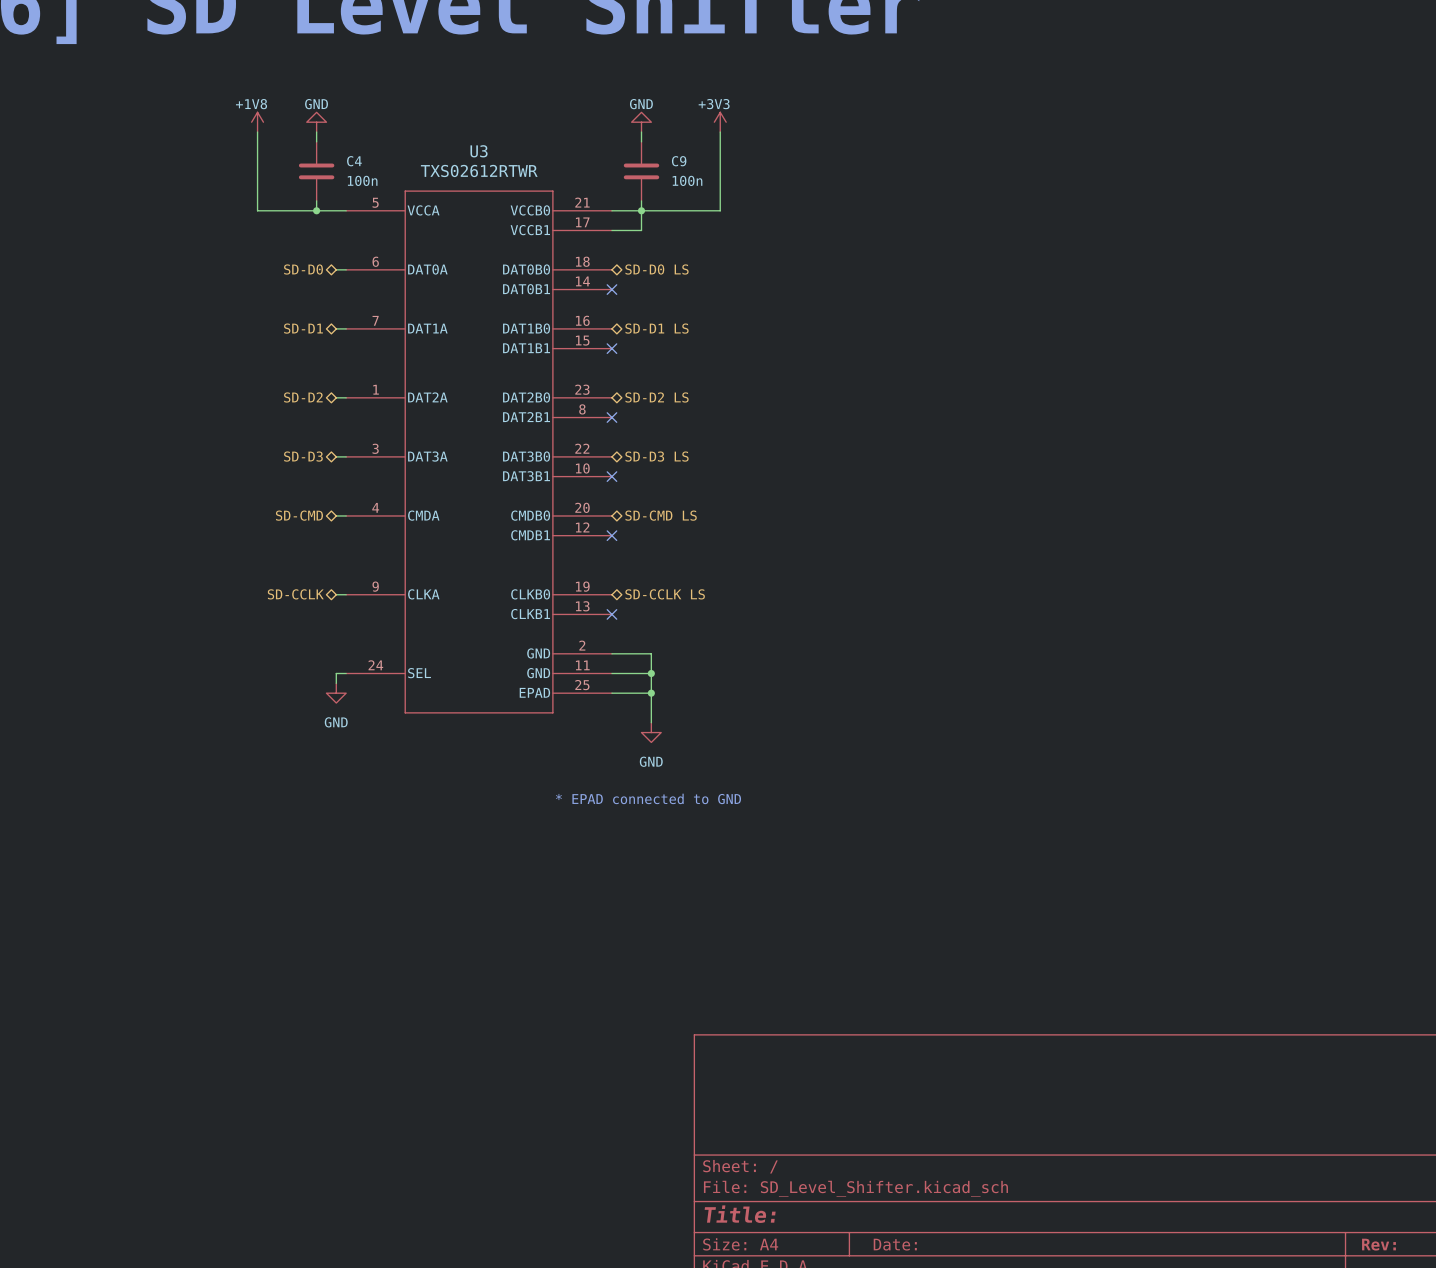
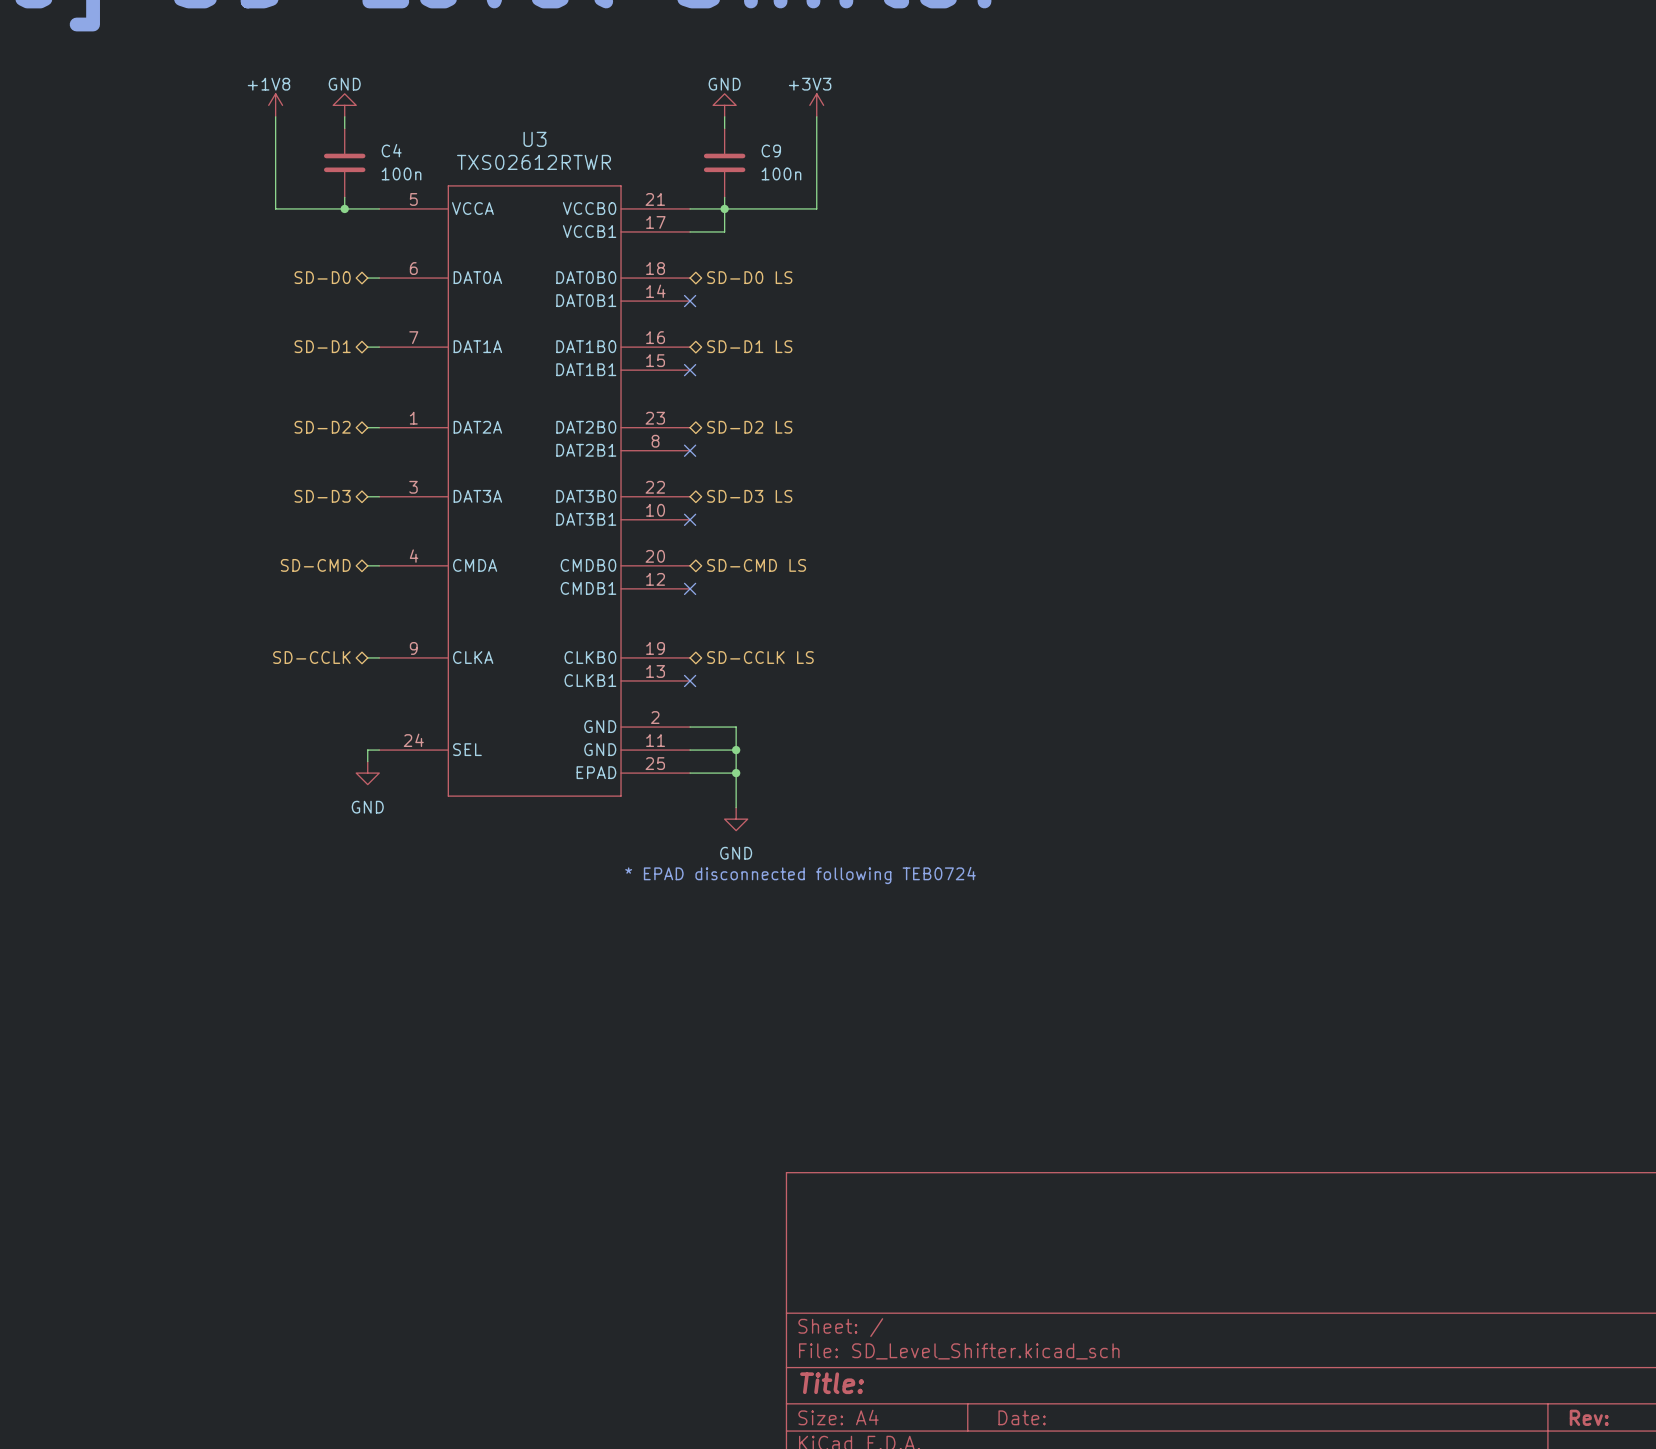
text: * EPAD connected to GND (648, 798) -> * EPAD disconnected following TEB0724 (800, 875)

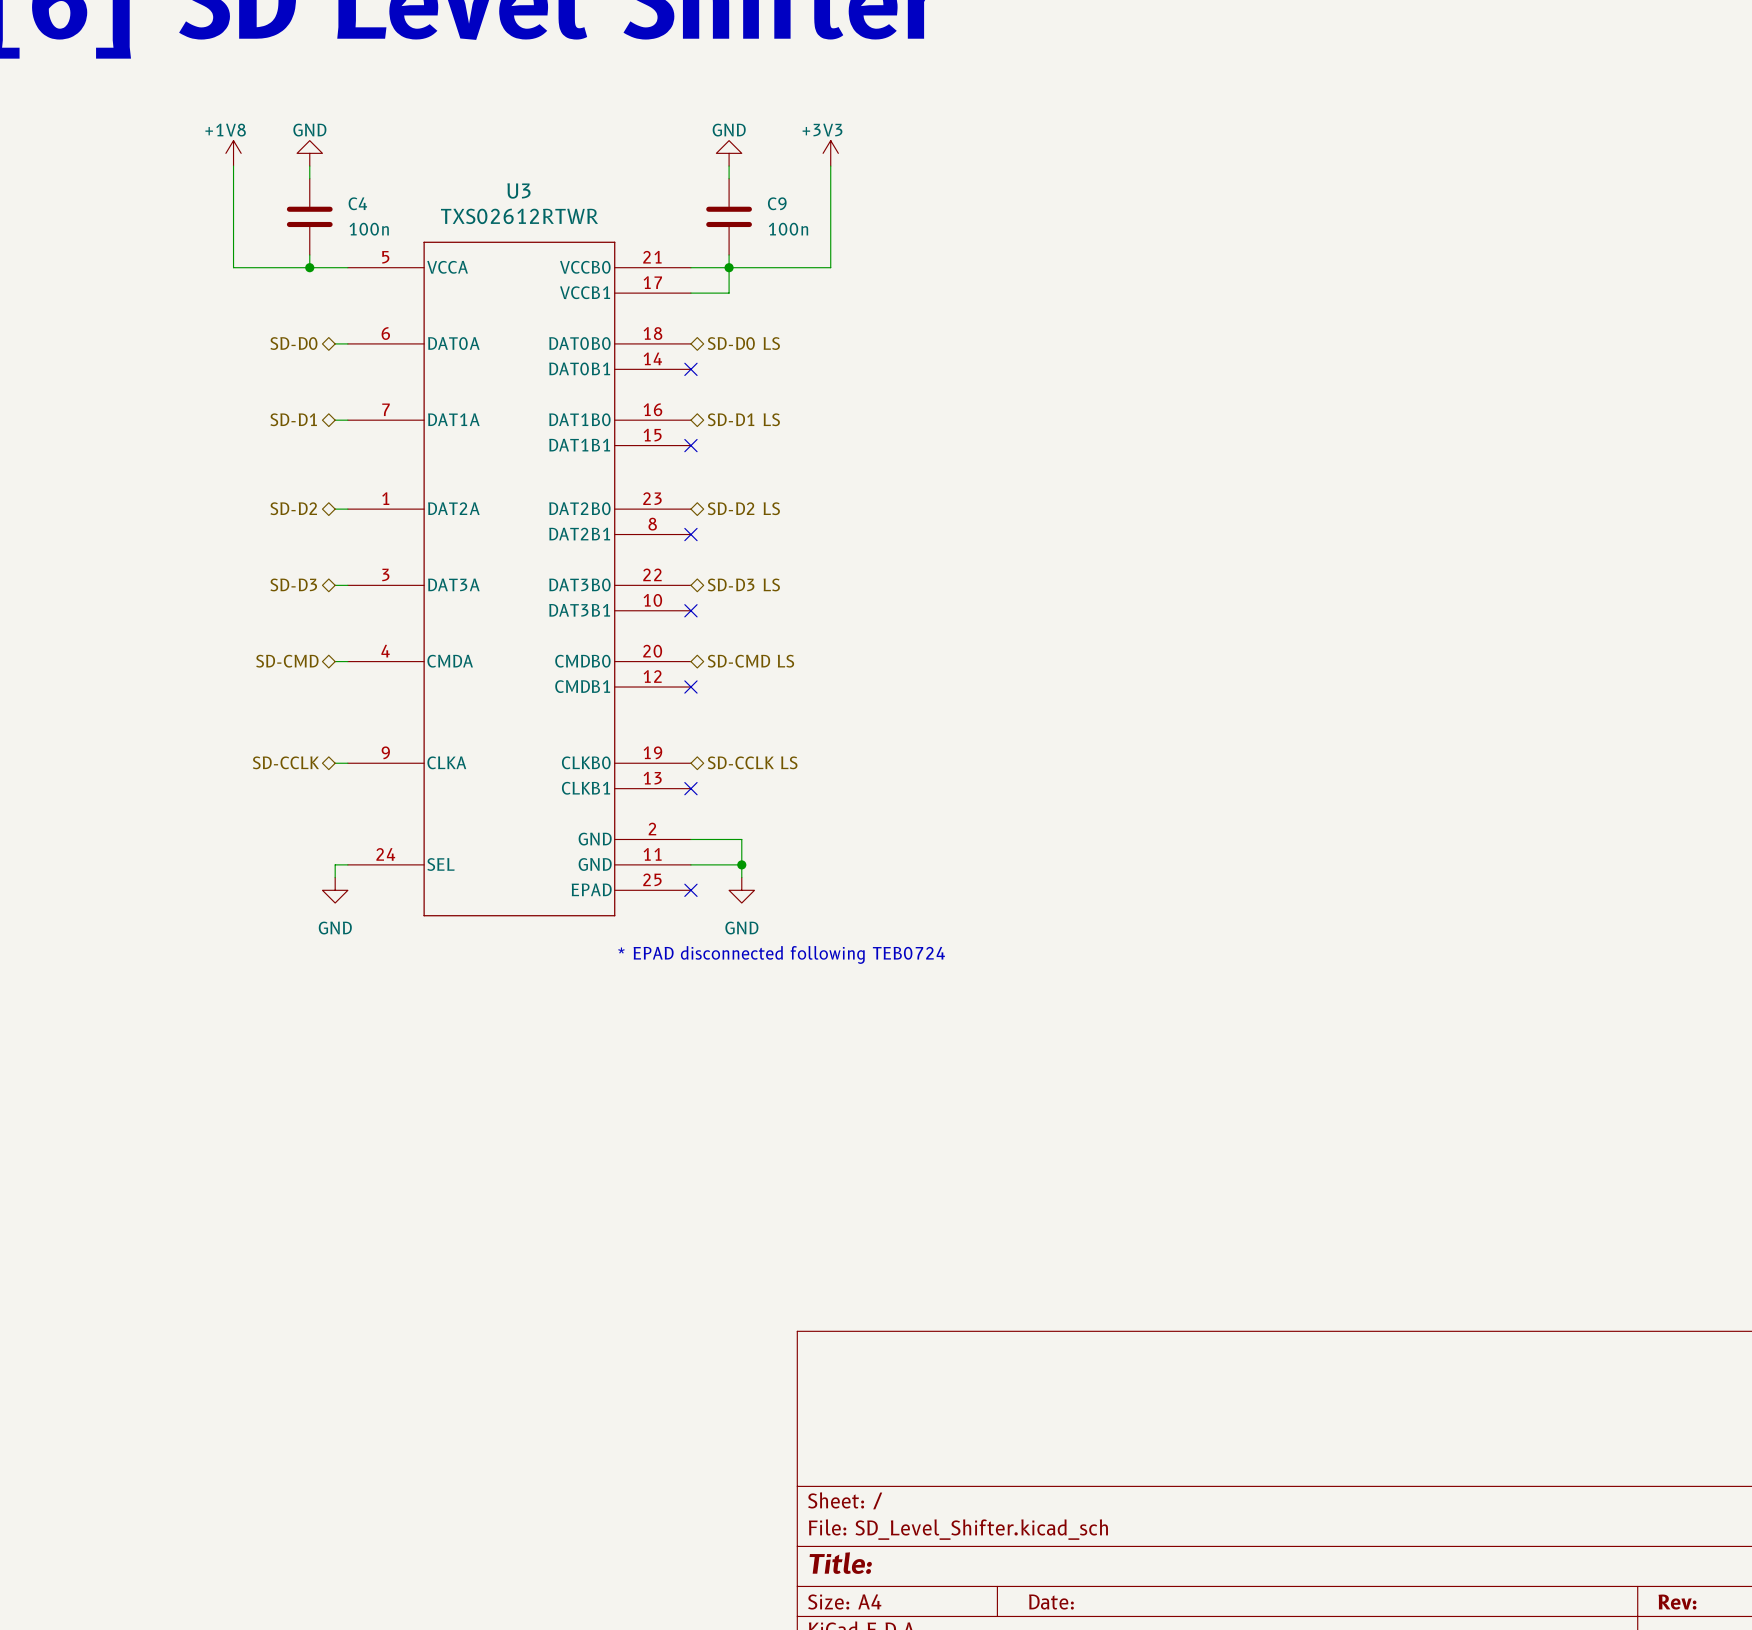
wire: (736, 761) (736, 807) -> none
wire: (690, 773) (736, 773) -> none
no-connect mark: none -> (690, 890)
junction: (736, 773) -> none
power symbol position: GND (736, 819) -> GND (741, 890)
text position: * EPAD disconnected following TEB0724 (800, 875) -> * EPAD disconnected following TEB0724 (781, 954)

